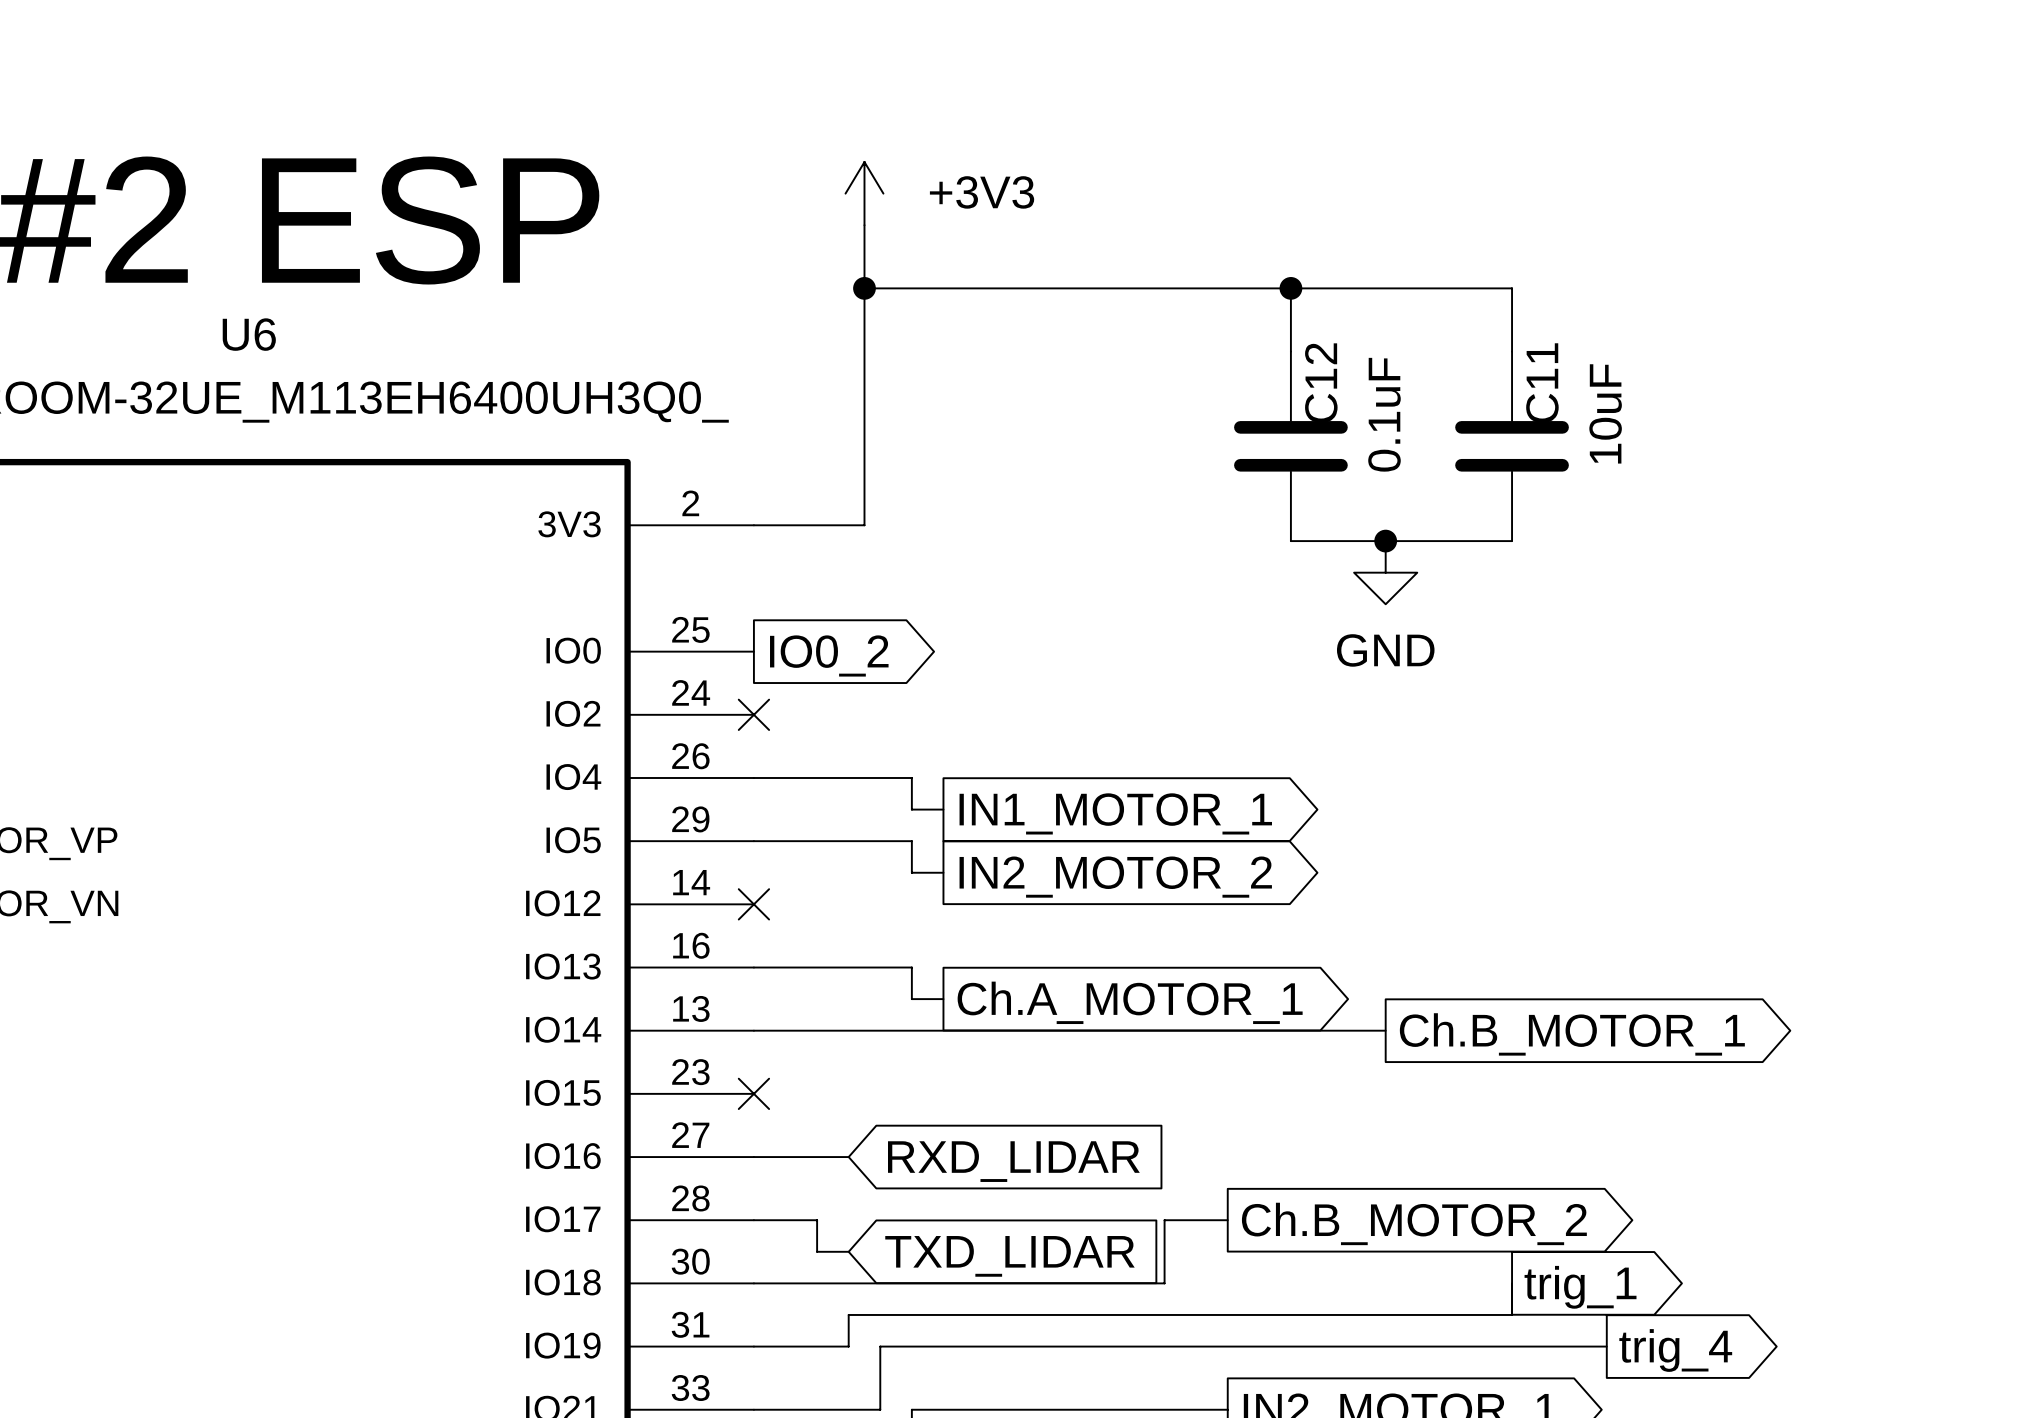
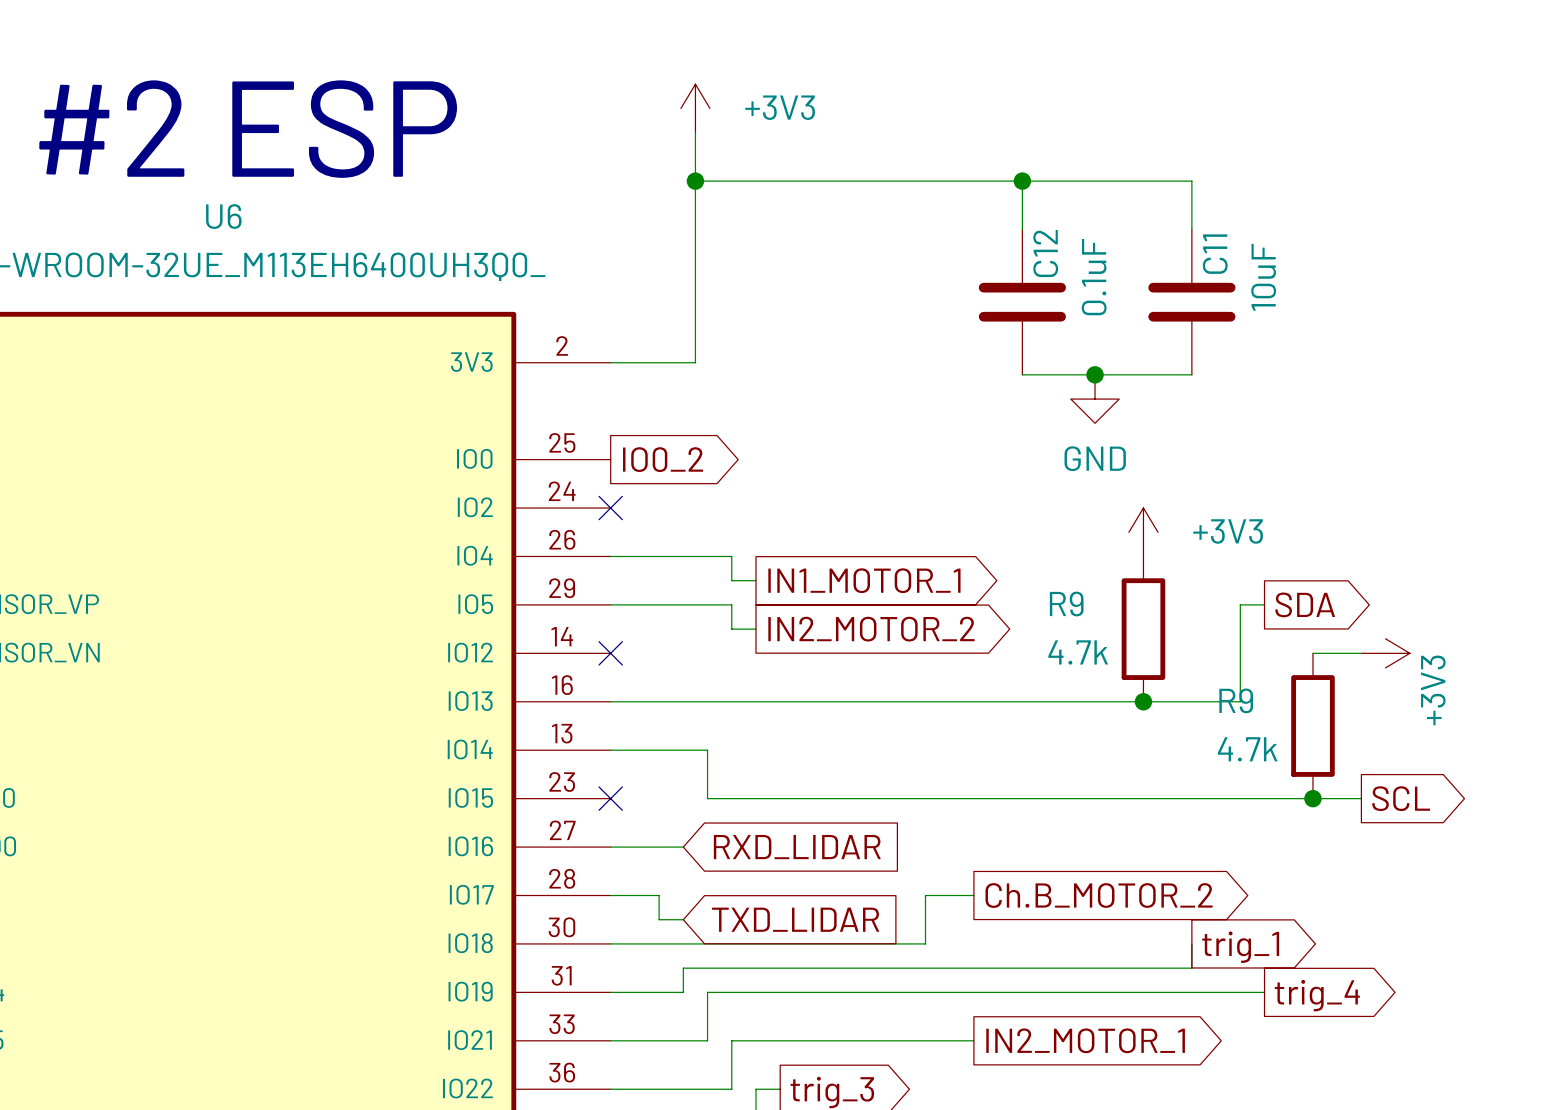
power symbol: none -> +3V3 (1143, 532)
global label: none -> SDA (1305, 604)
R9: none -> 4.7k (1143, 629)
wire: none -> (1312, 653) (1361, 653)
power symbol: none -> +3V3 (1385, 653)
wire: (911, 967) (911, 999) (943, 999) -> (731, 701) (1240, 701) (1240, 604) (1264, 604)
junction: none -> (1143, 701)
R9: none -> 4.7k (1312, 725)
global label: Ch.A_MOTOR_1 (1130, 1002) -> none
wire: (880, 1030) (1385, 1030) -> (707, 750) (707, 798) (1361, 798)
global label: Ch.B_MOTOR_1 (1572, 1034) -> none
junction: none -> (1312, 798)
global label: none -> SCL (1401, 798)

